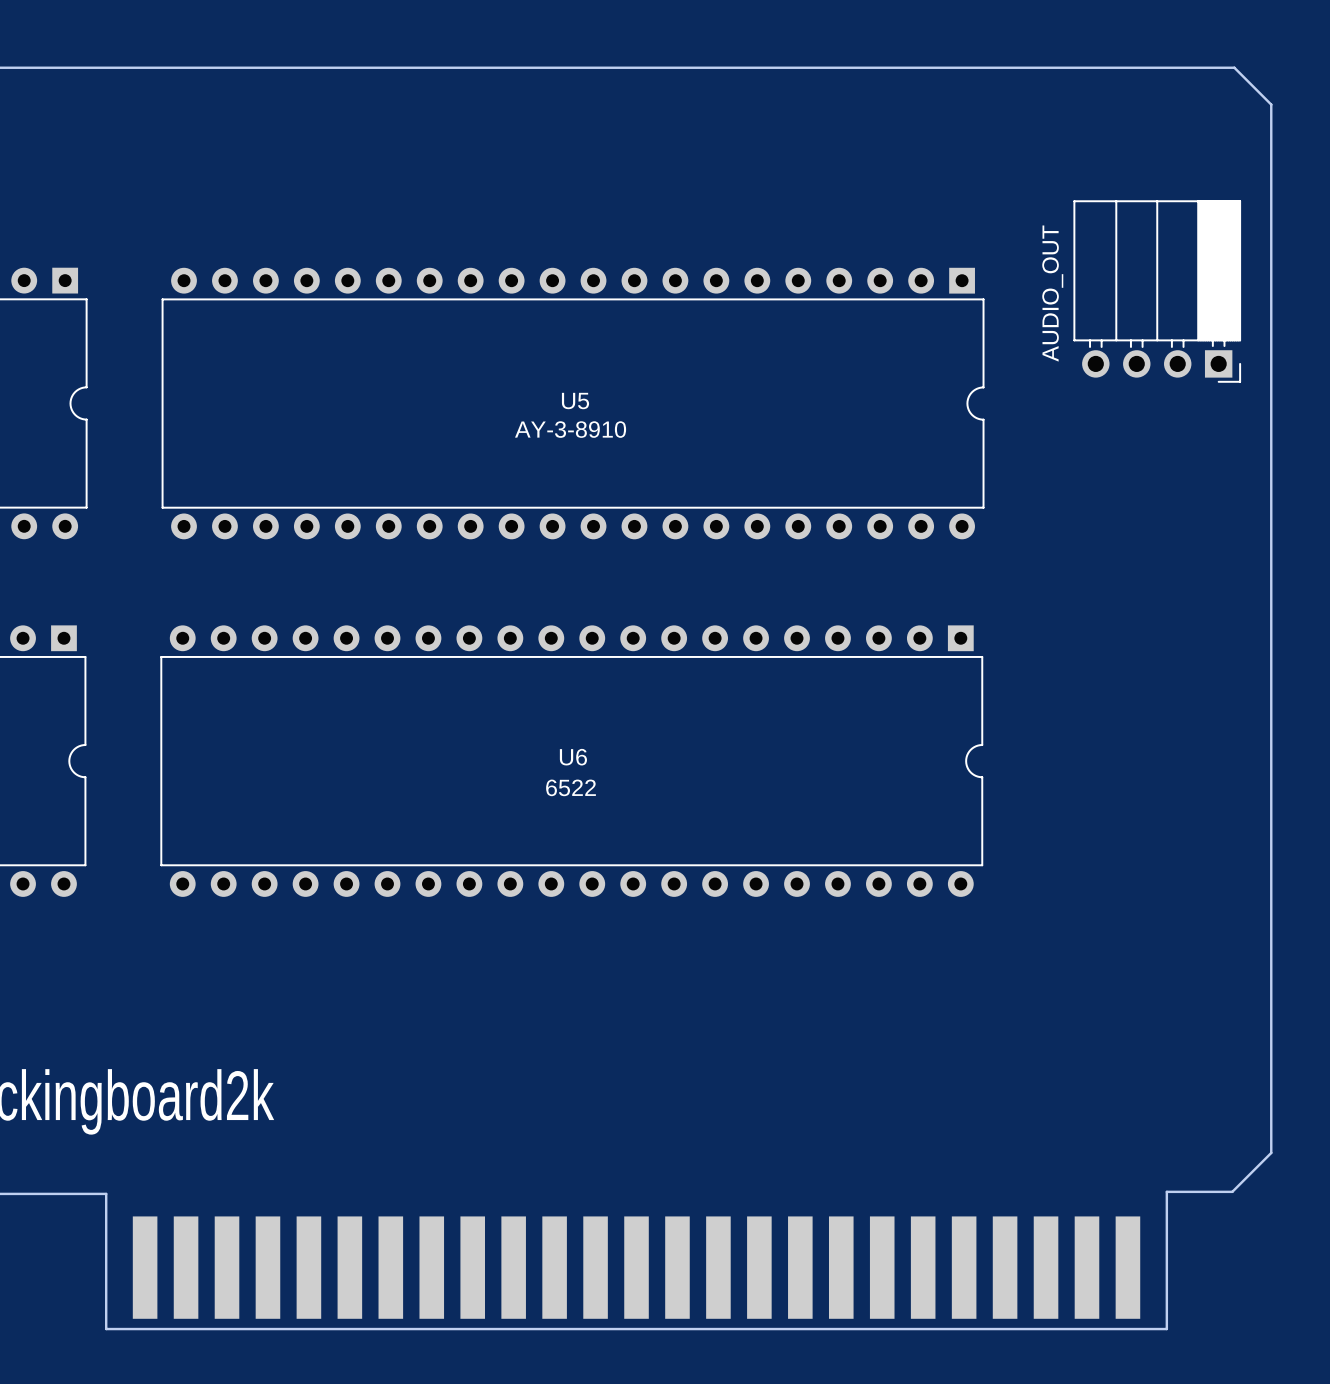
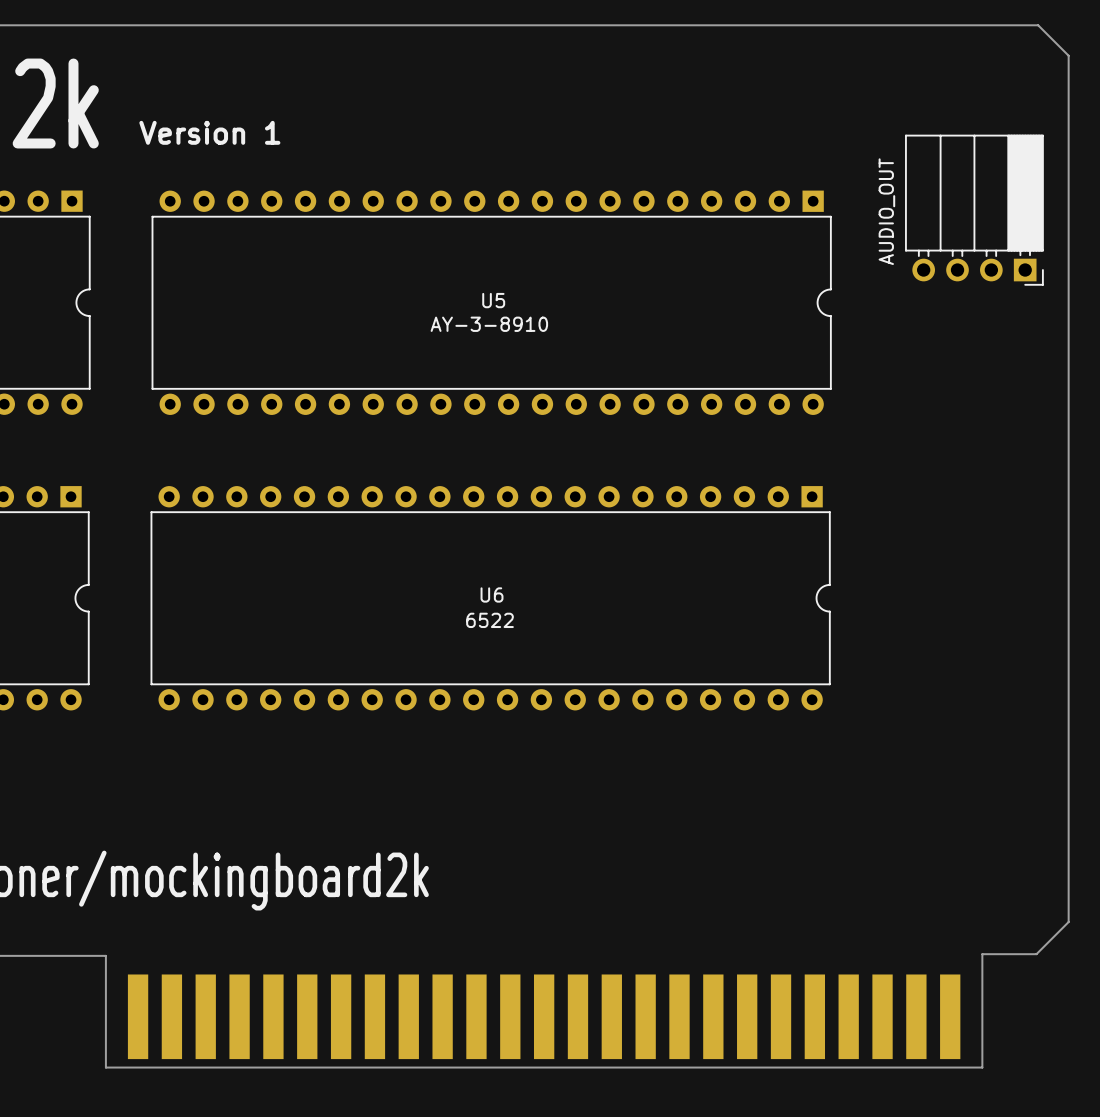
text: none -> Version 1 (209, 132)

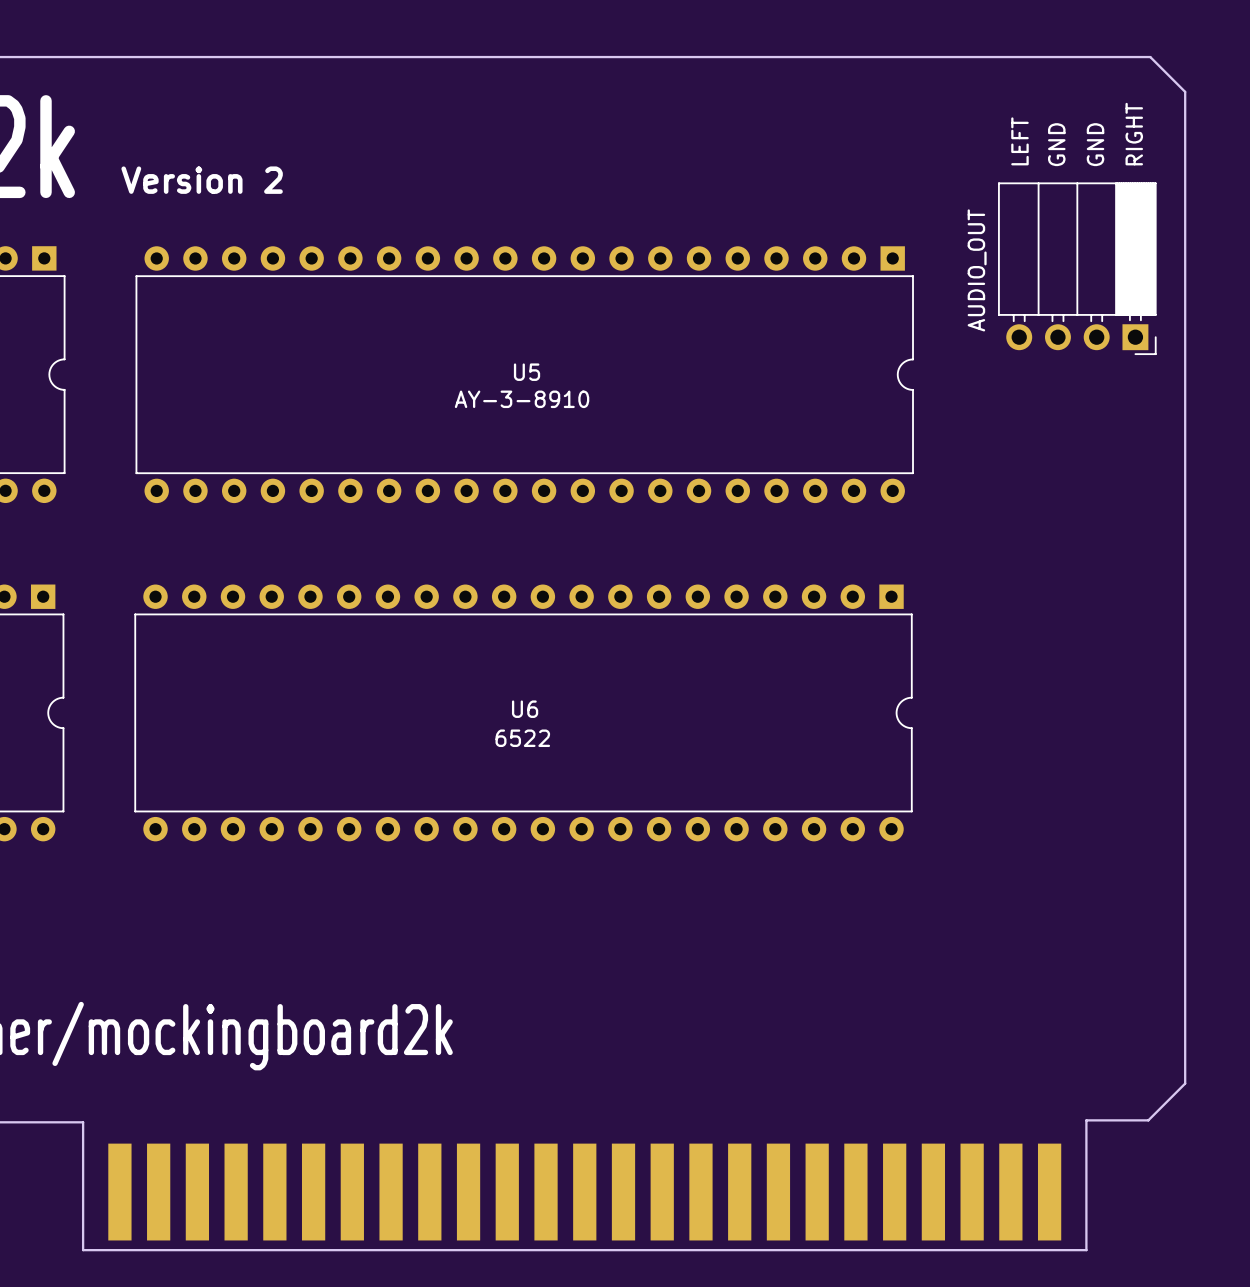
text: none -> RIGHT (1134, 134)
text: none -> LEFT (1019, 141)
text: none -> GND (1056, 144)
text: none -> GND (1095, 144)
text: Version 1 (209, 132) -> Version 2 (202, 180)

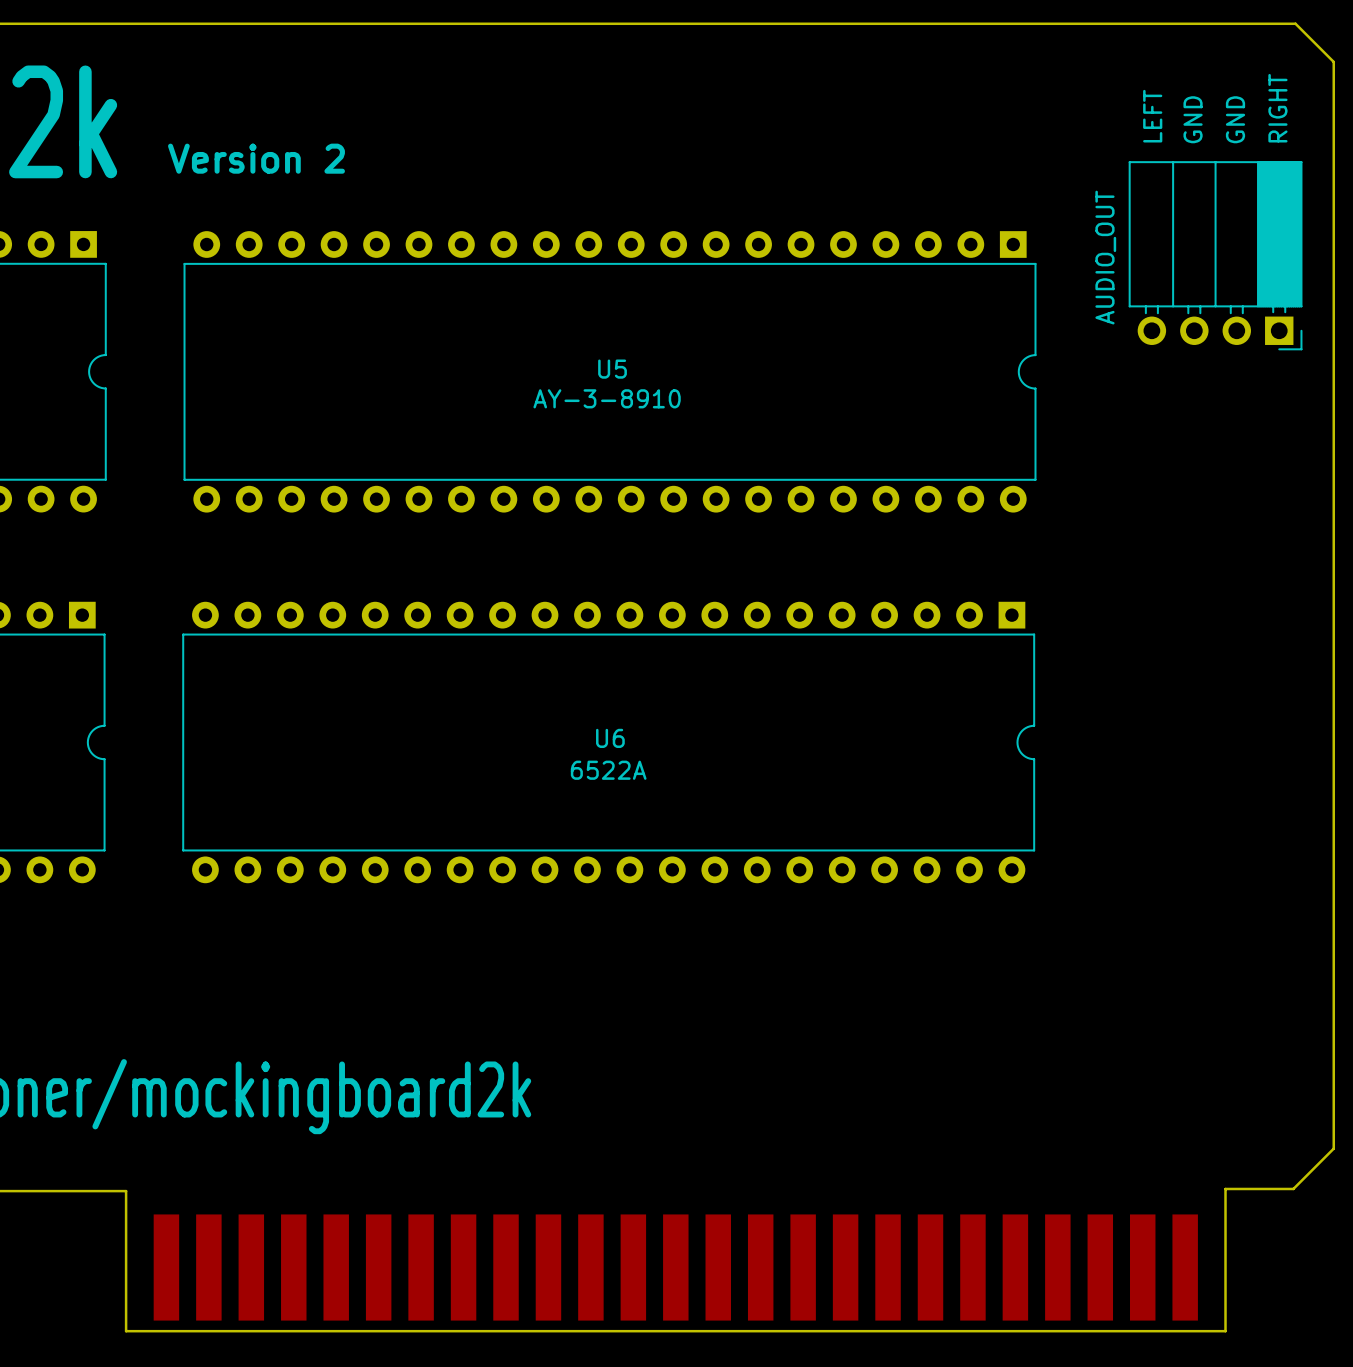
U6 value: 6522 (522, 738) -> 6522A (608, 770)

